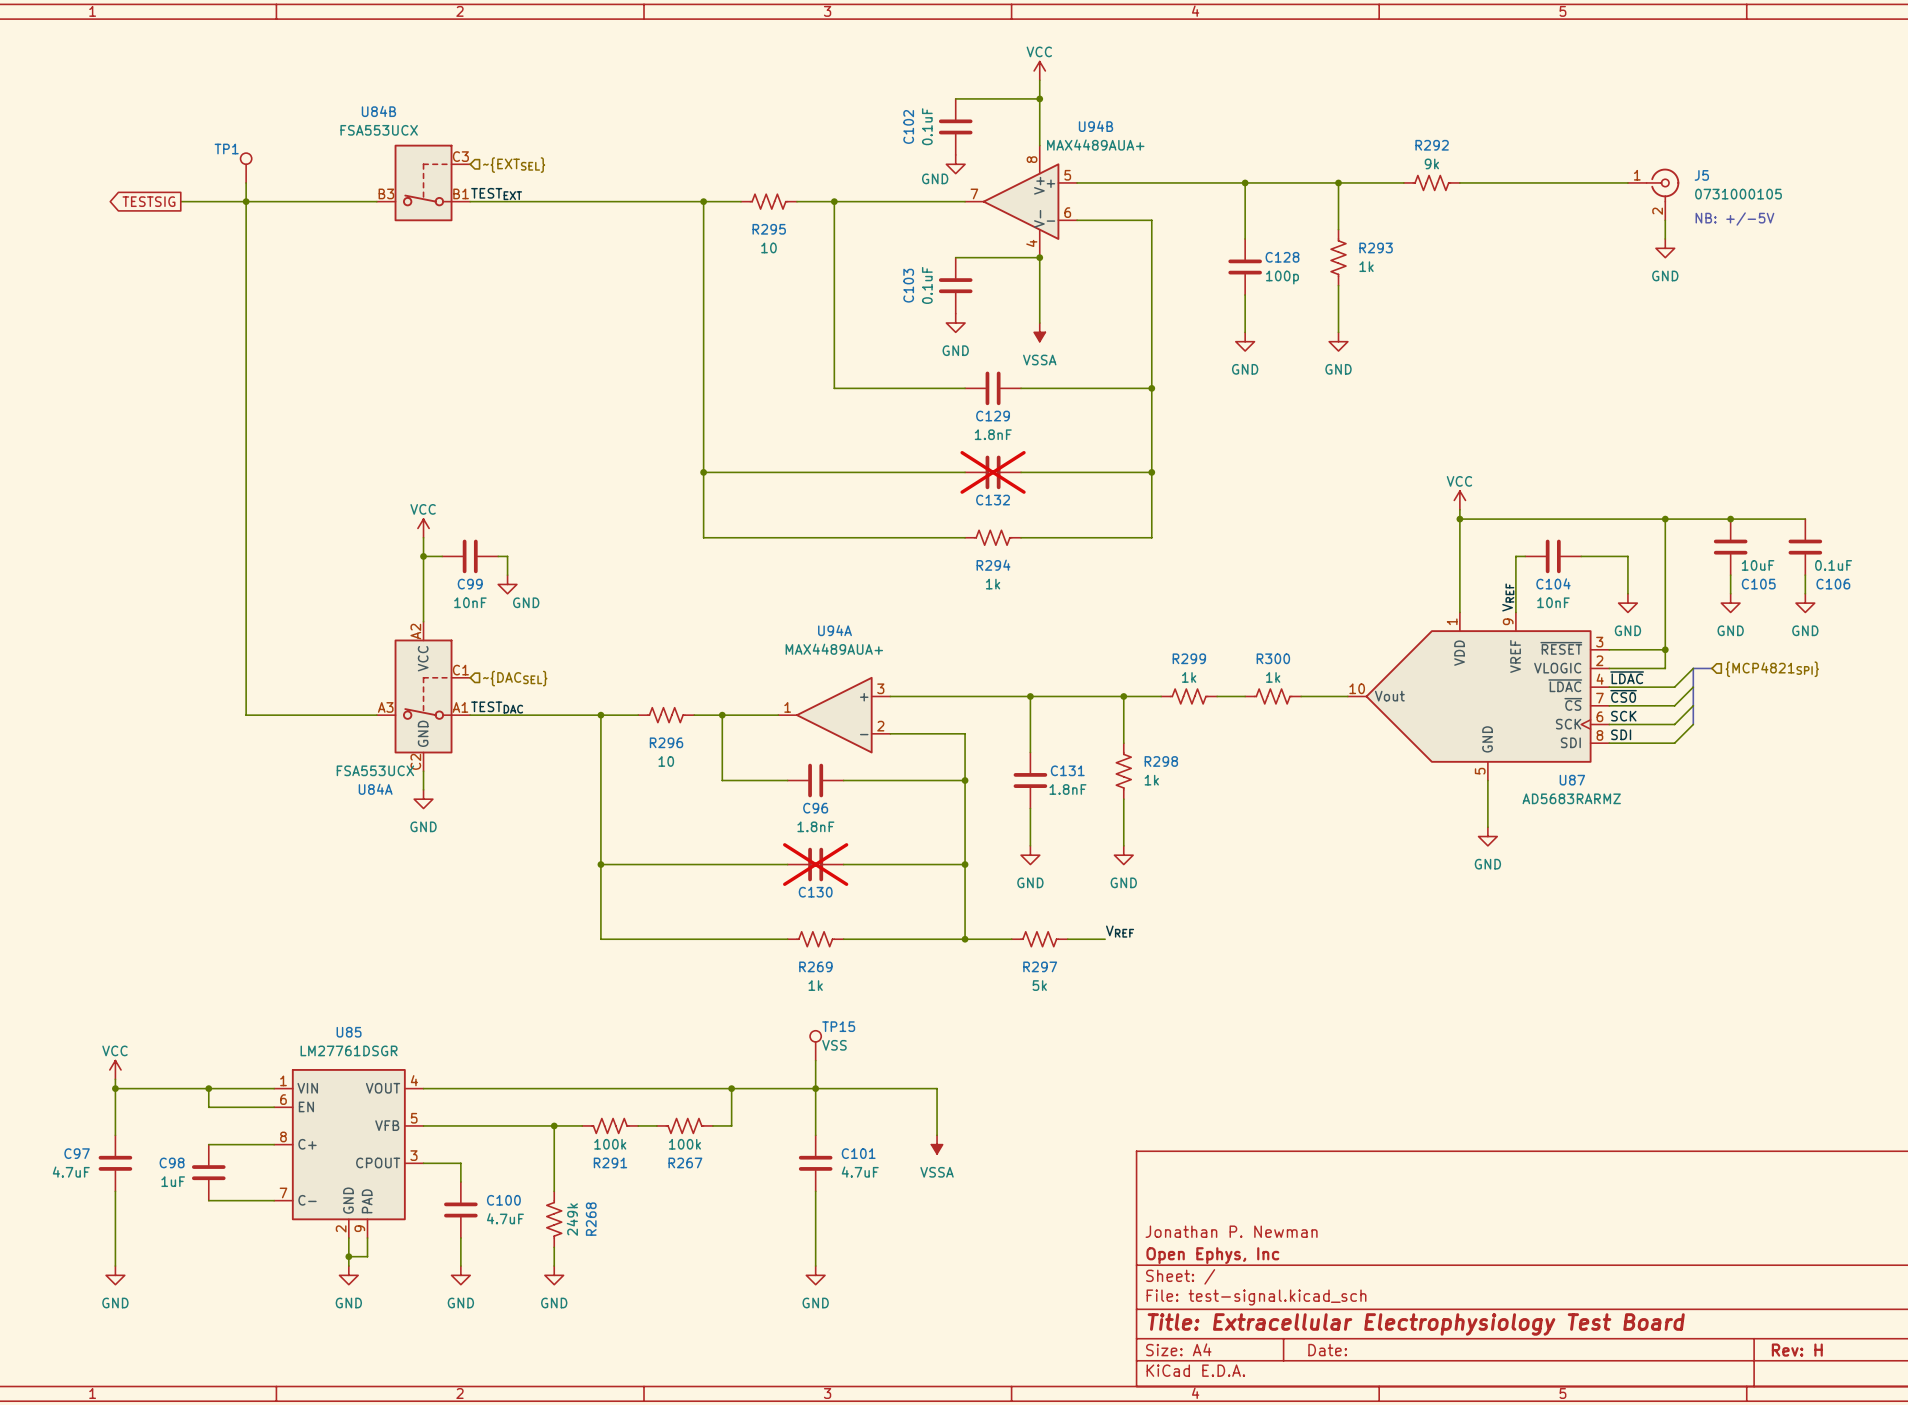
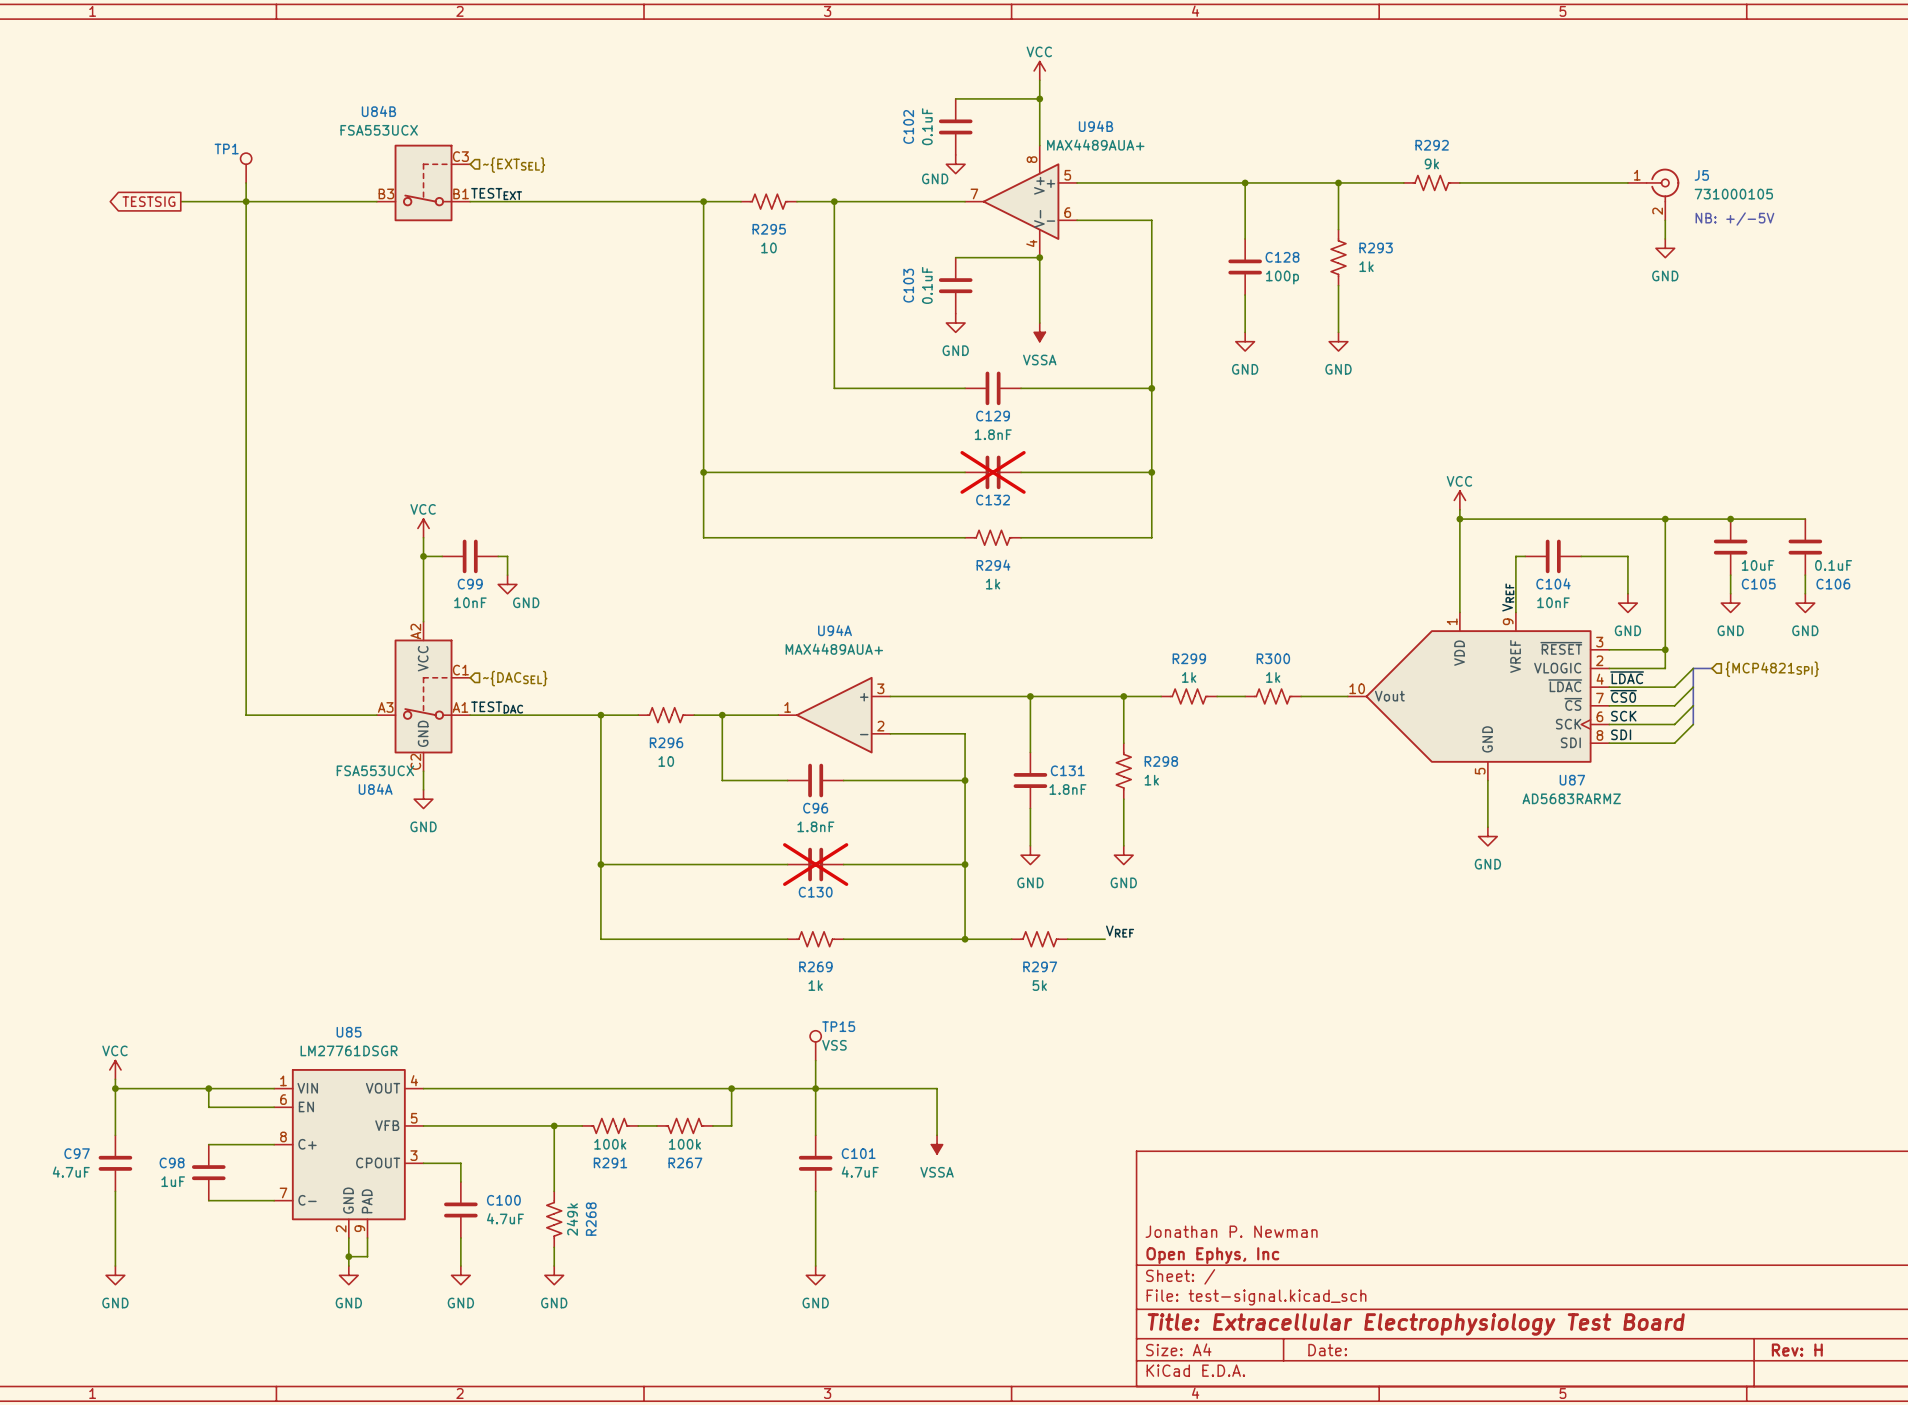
J5 value: 0731000105 (1738, 194) -> 731000105 (1733, 194)

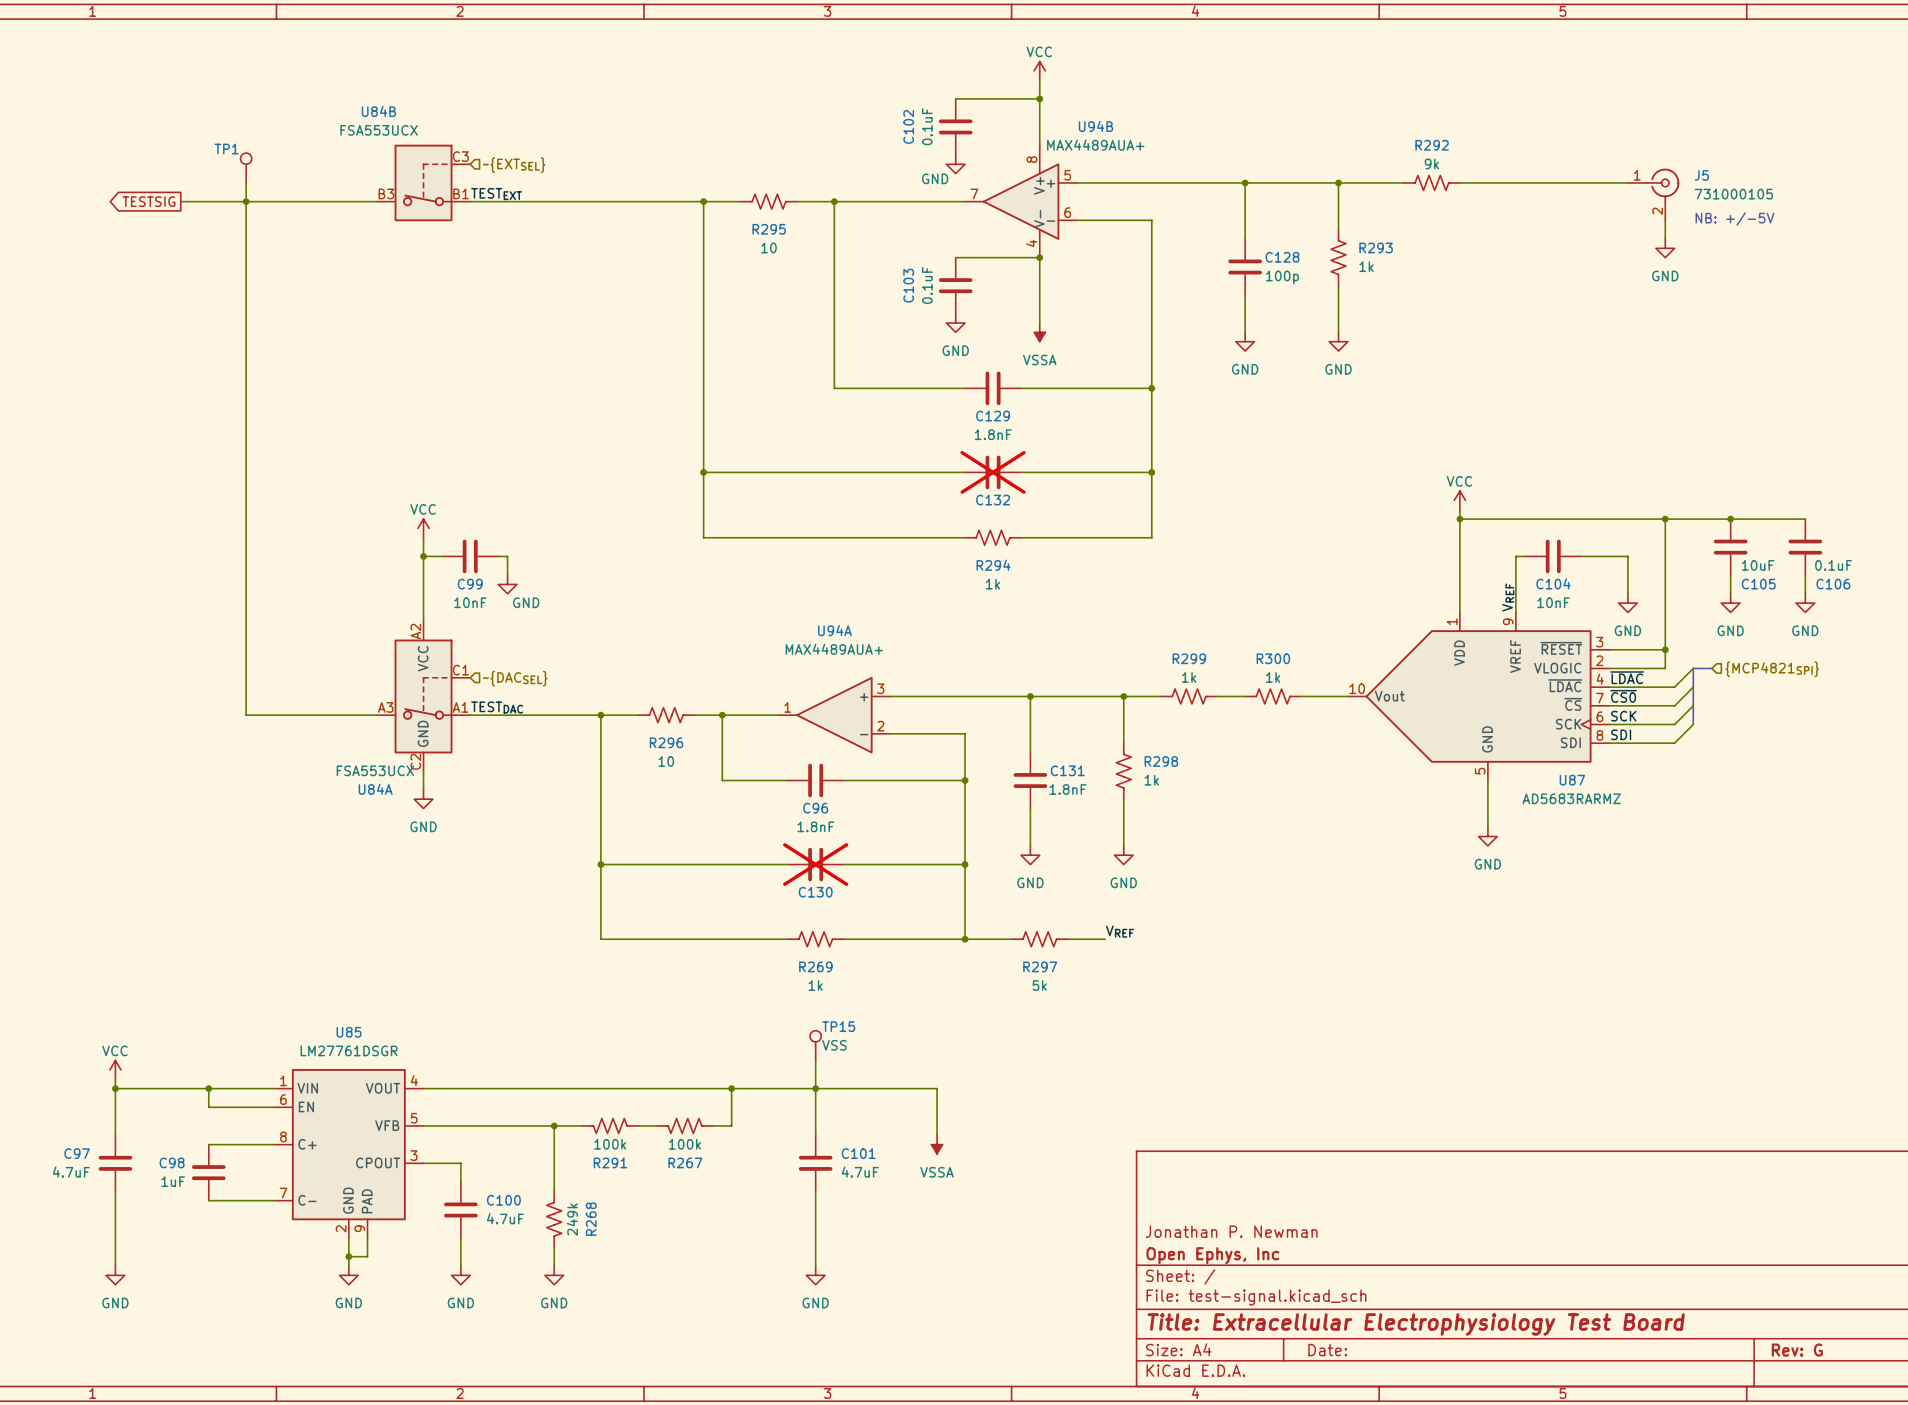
title block: Rev: H (1797, 1350) -> Rev: G (1797, 1350)

